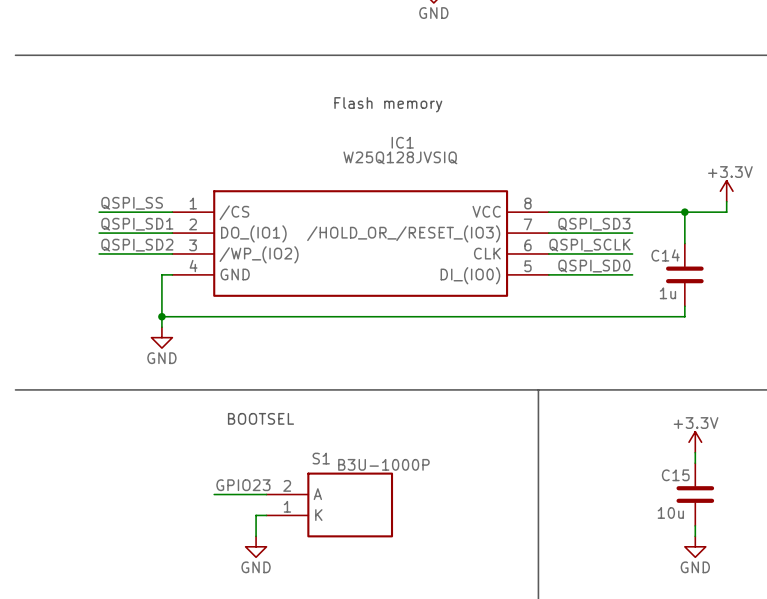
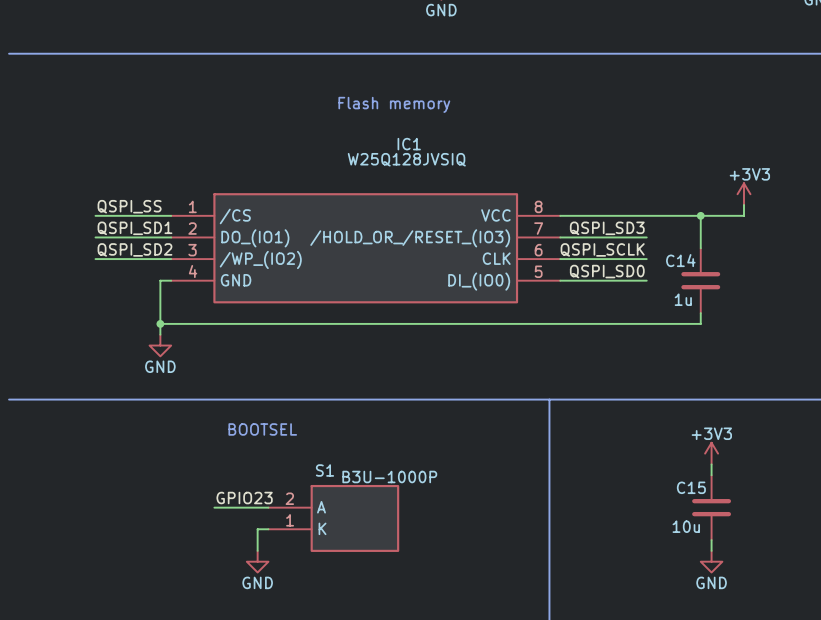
power symbol: +3.3V (726, 191) -> +3V3 (744, 194)
power symbol: +3.3V (695, 442) -> +3V3 (711, 453)

